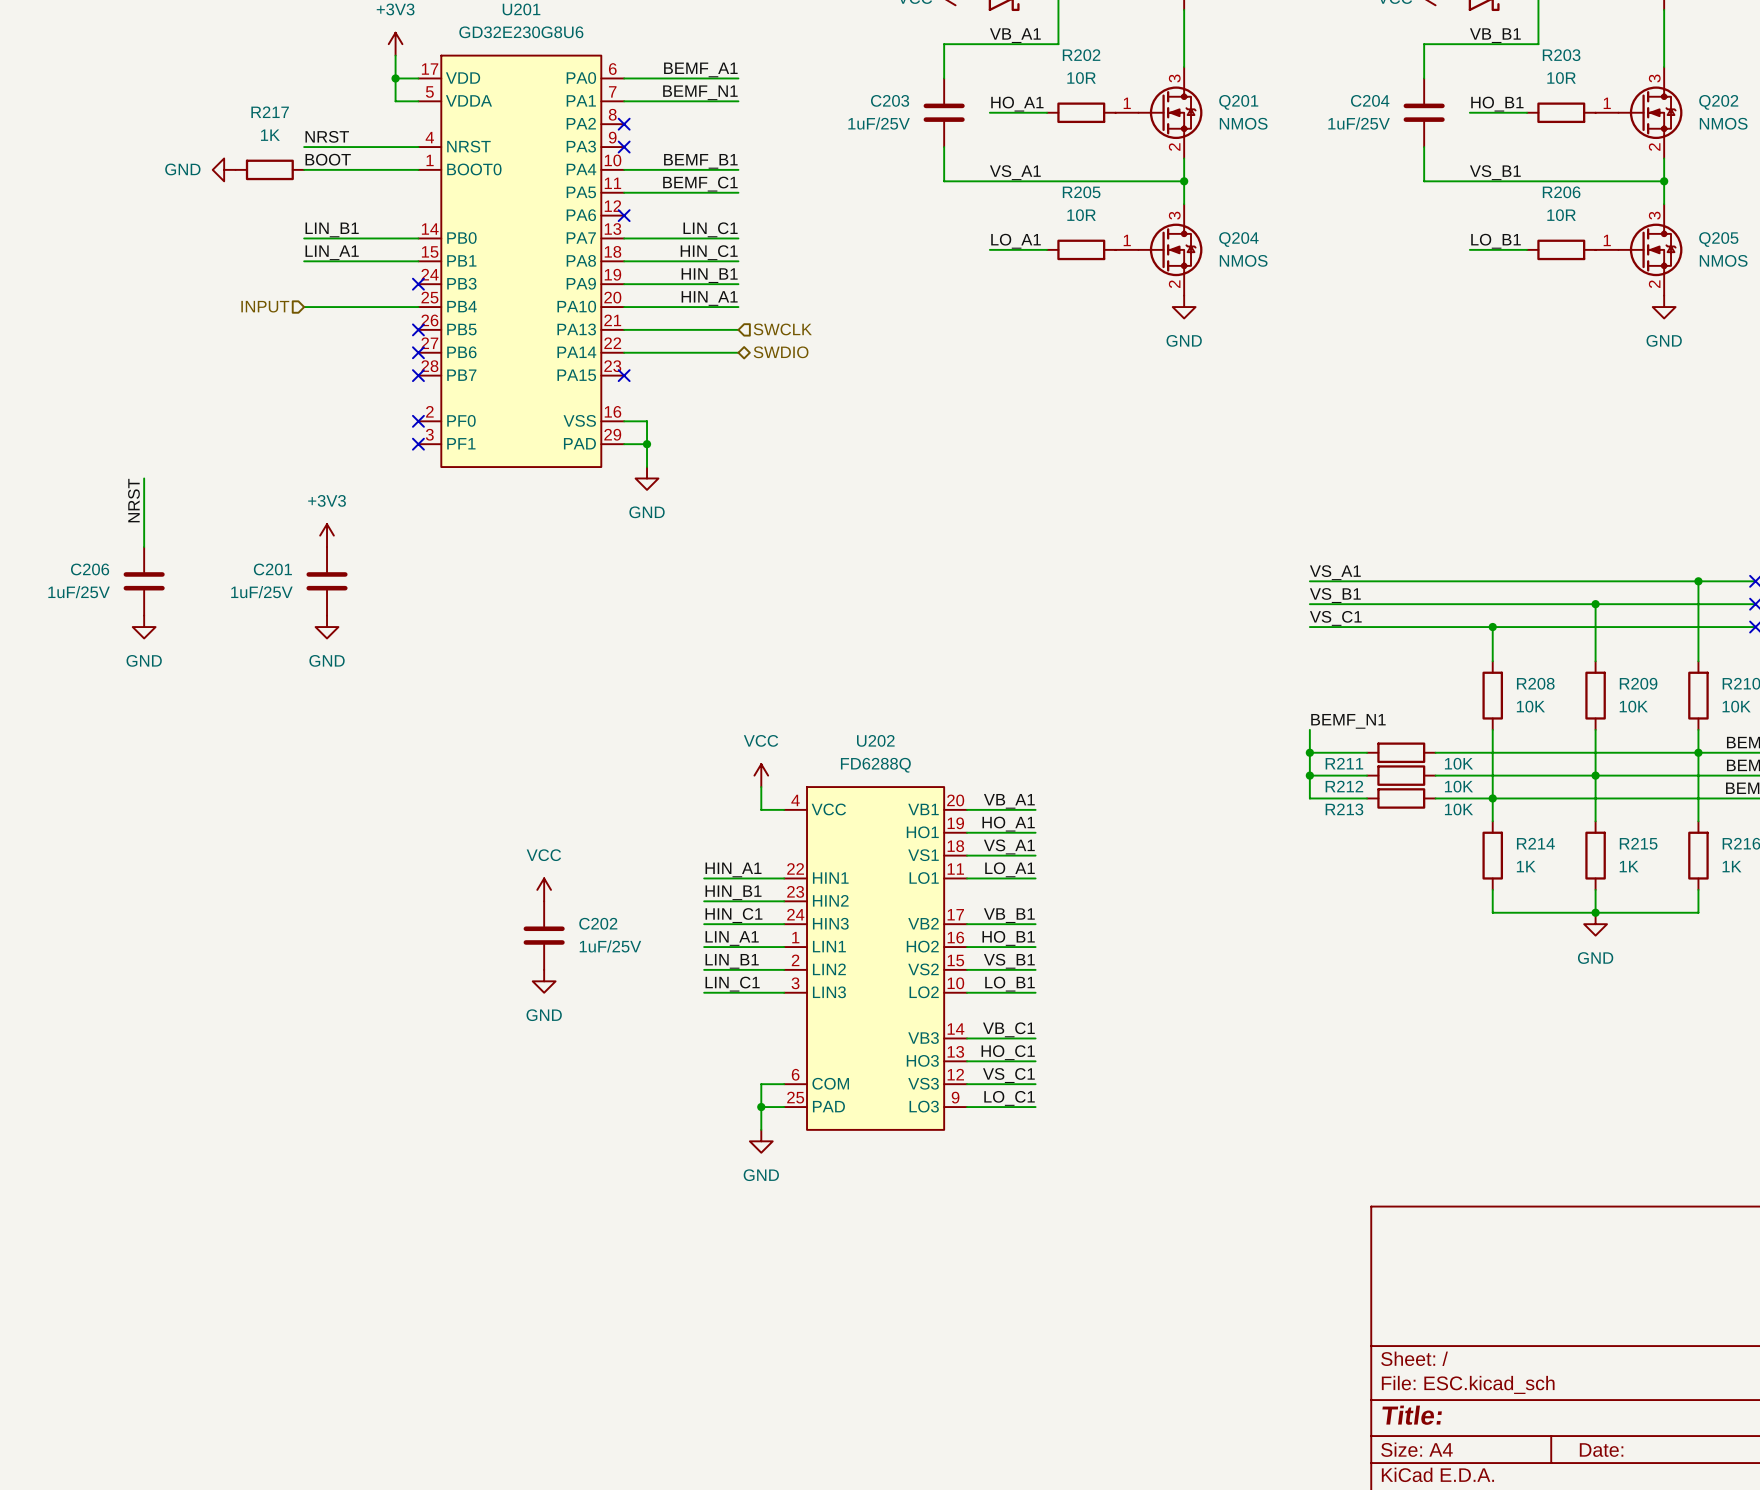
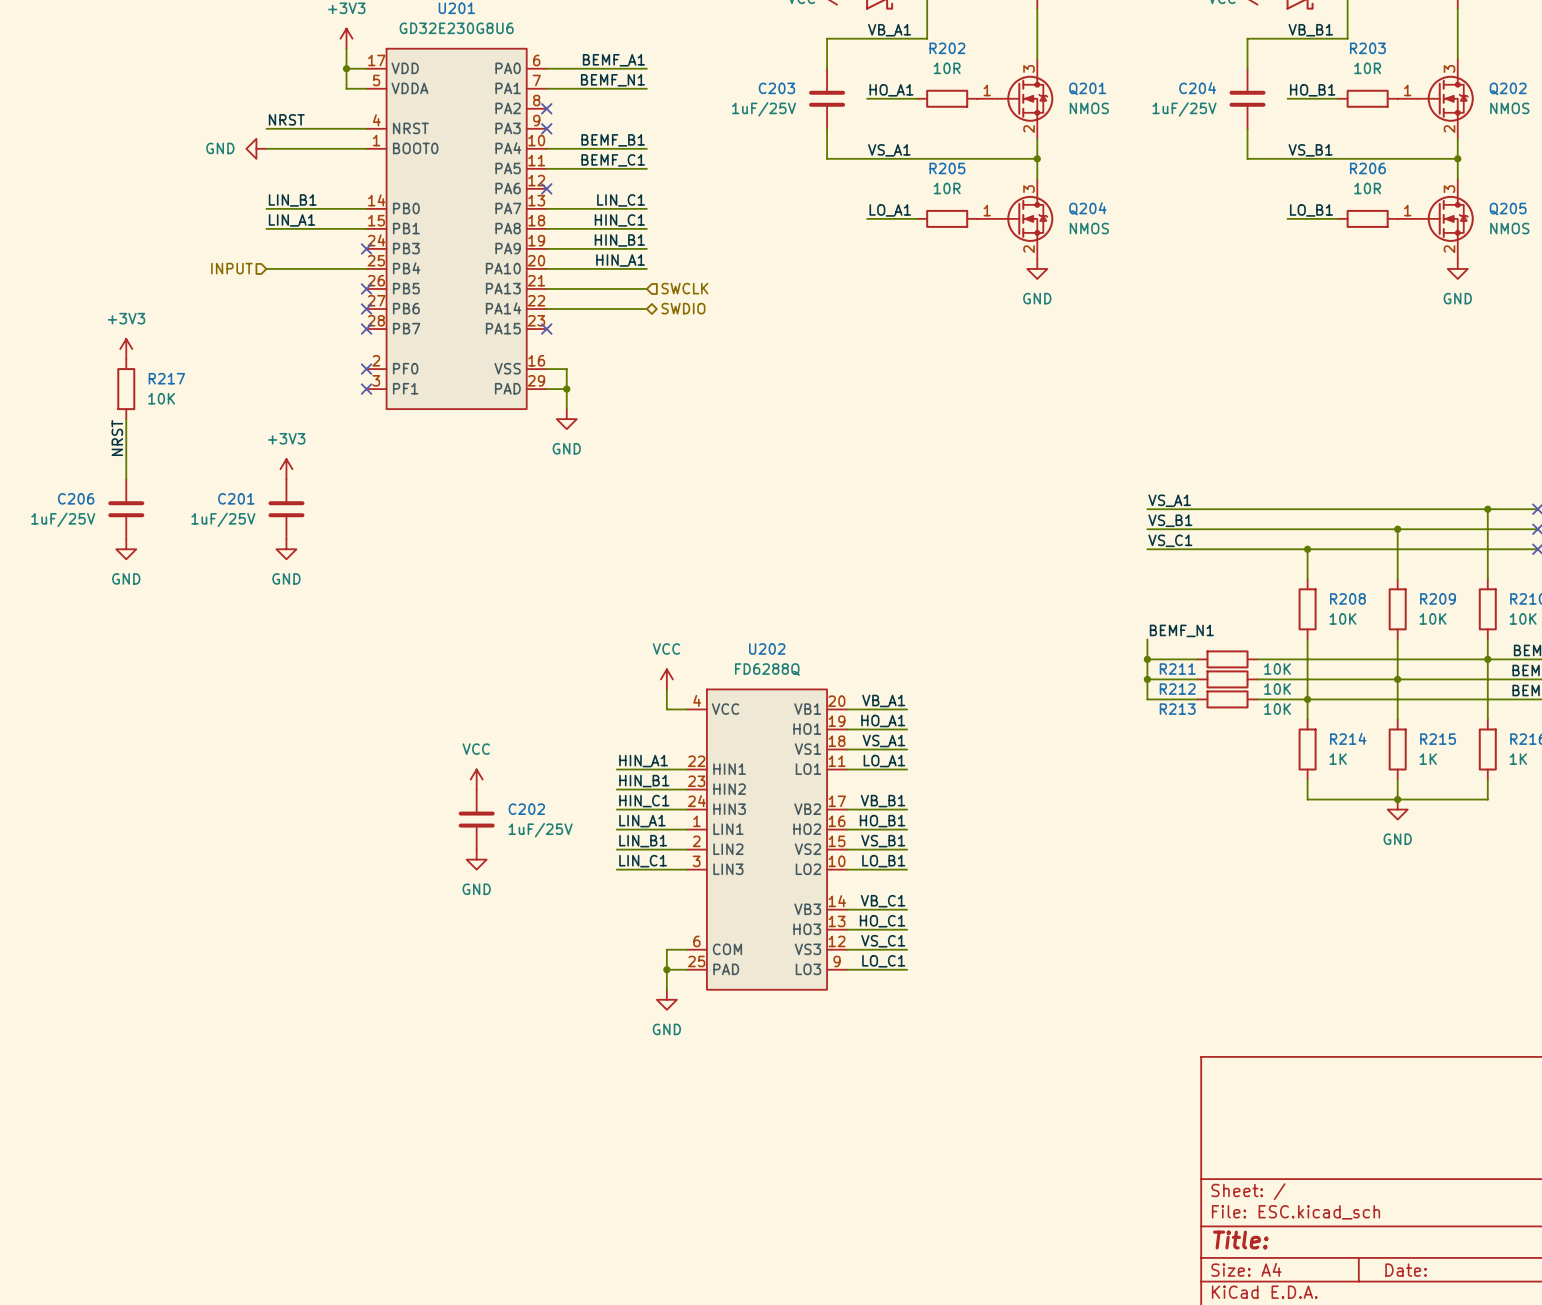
R217 value: 1K (270, 135) -> 10K (161, 398)
label: BOOT (328, 159) -> none
power symbol position: GND (224, 169) -> GND (256, 148)
R217 rotation: 0° (269, 169) -> 90° clockwise (126, 389)
R217 position: (269, 169) -> (126, 389)
power symbol: none -> +3V3 (126, 349)

